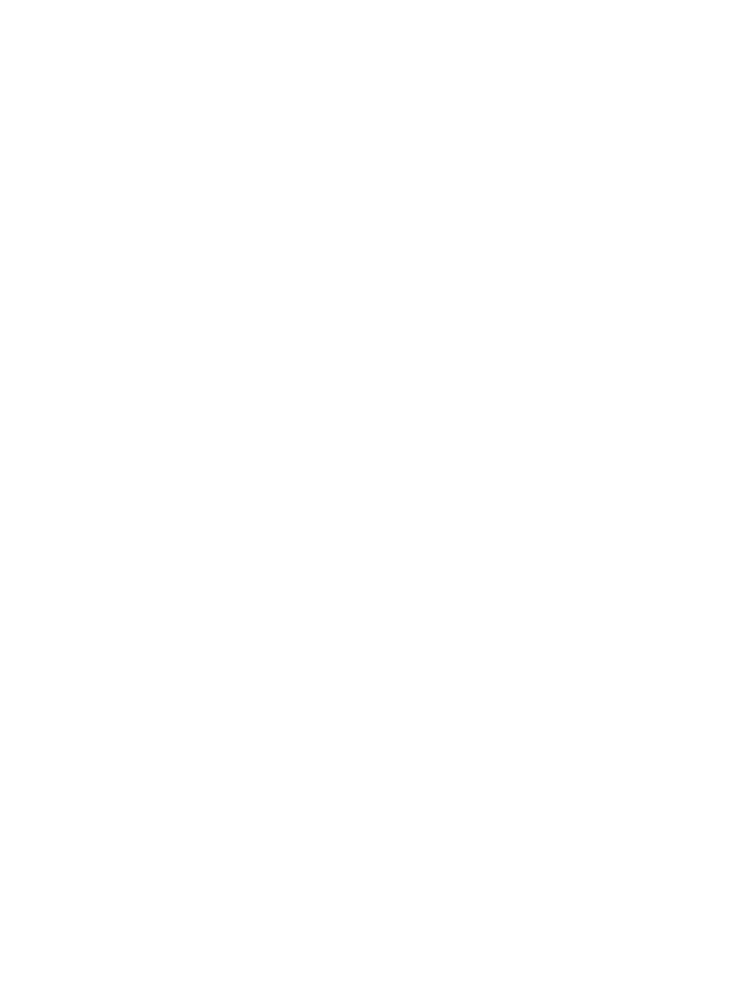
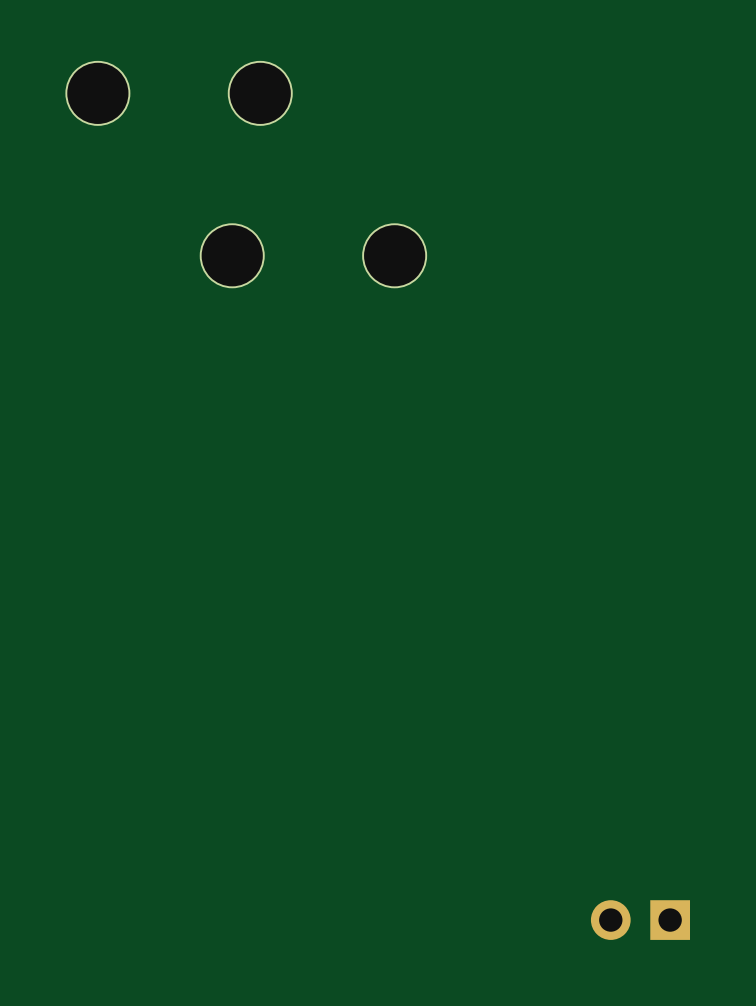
part: none -> (97, 93)
part: none -> (260, 93)
part: none -> (232, 255)
part: none -> (394, 255)
part: none -> (640, 920)

